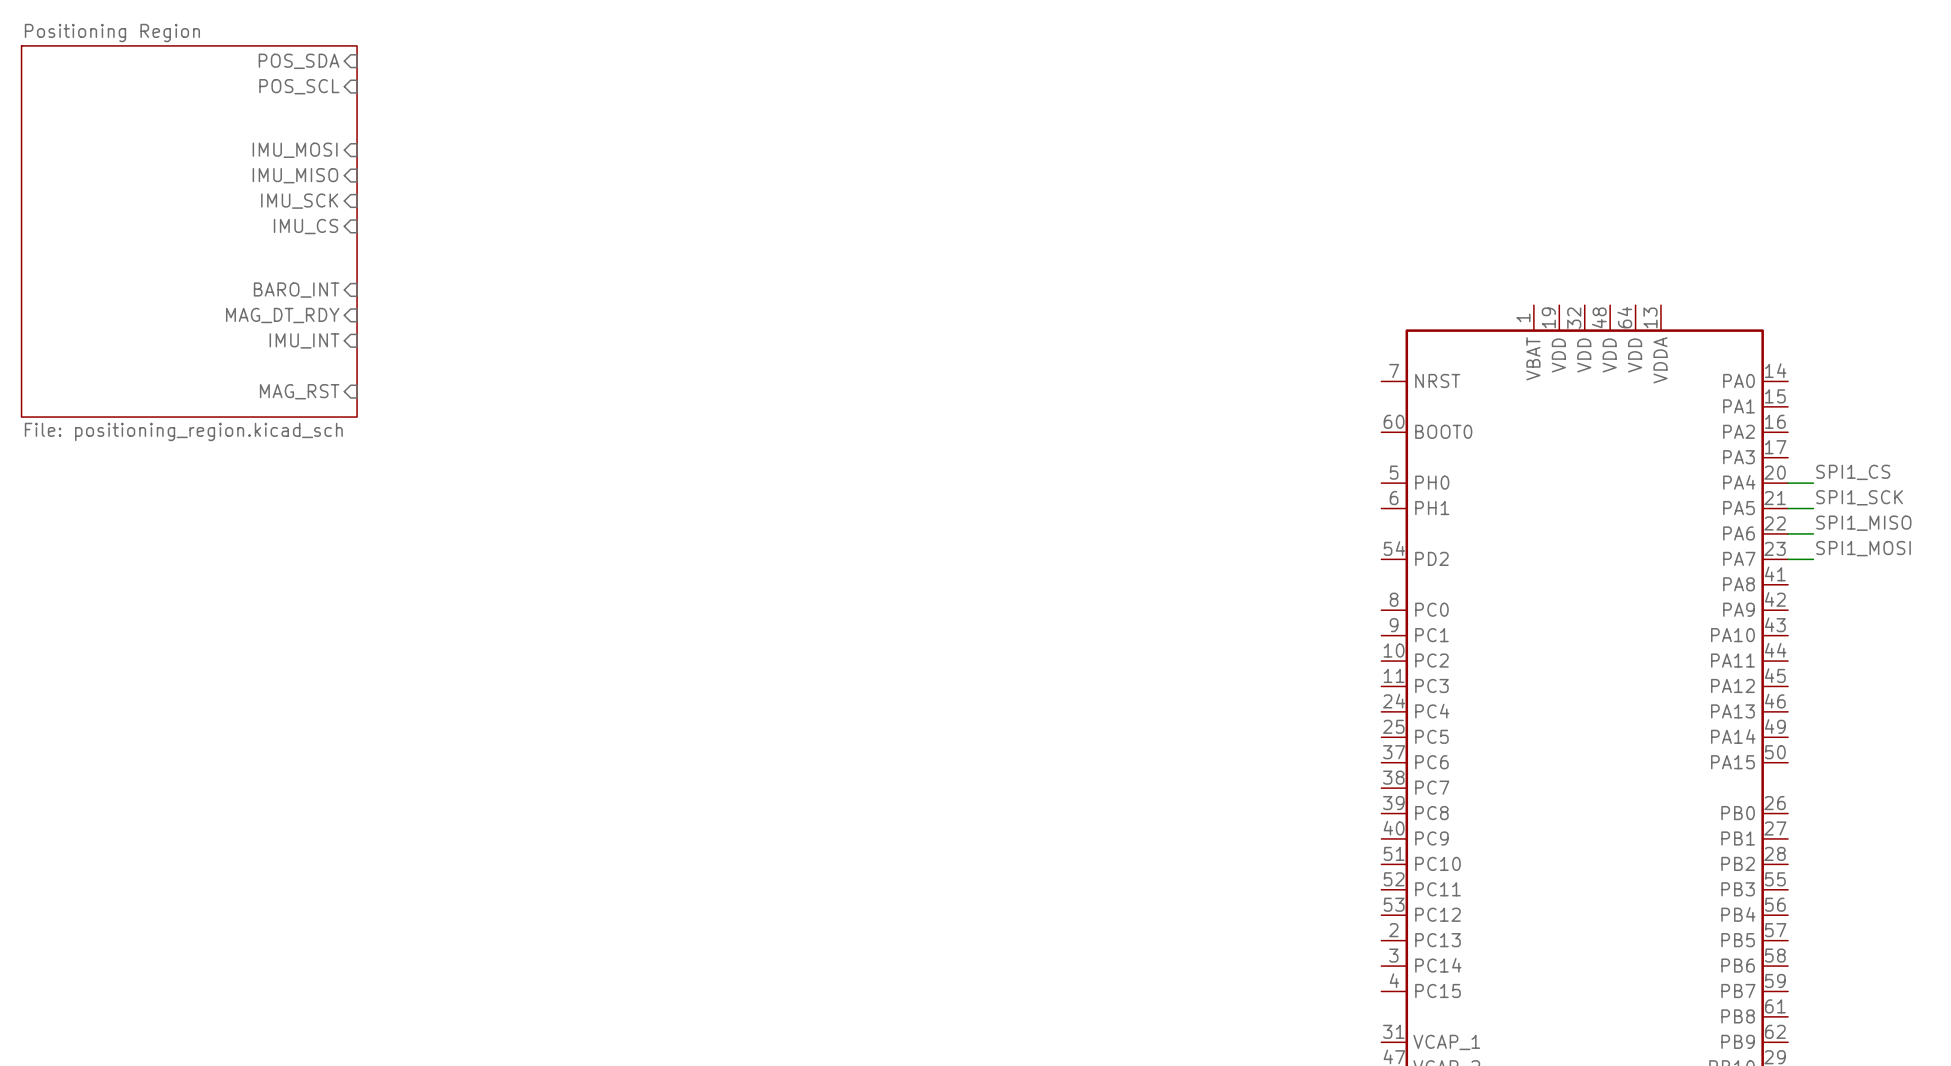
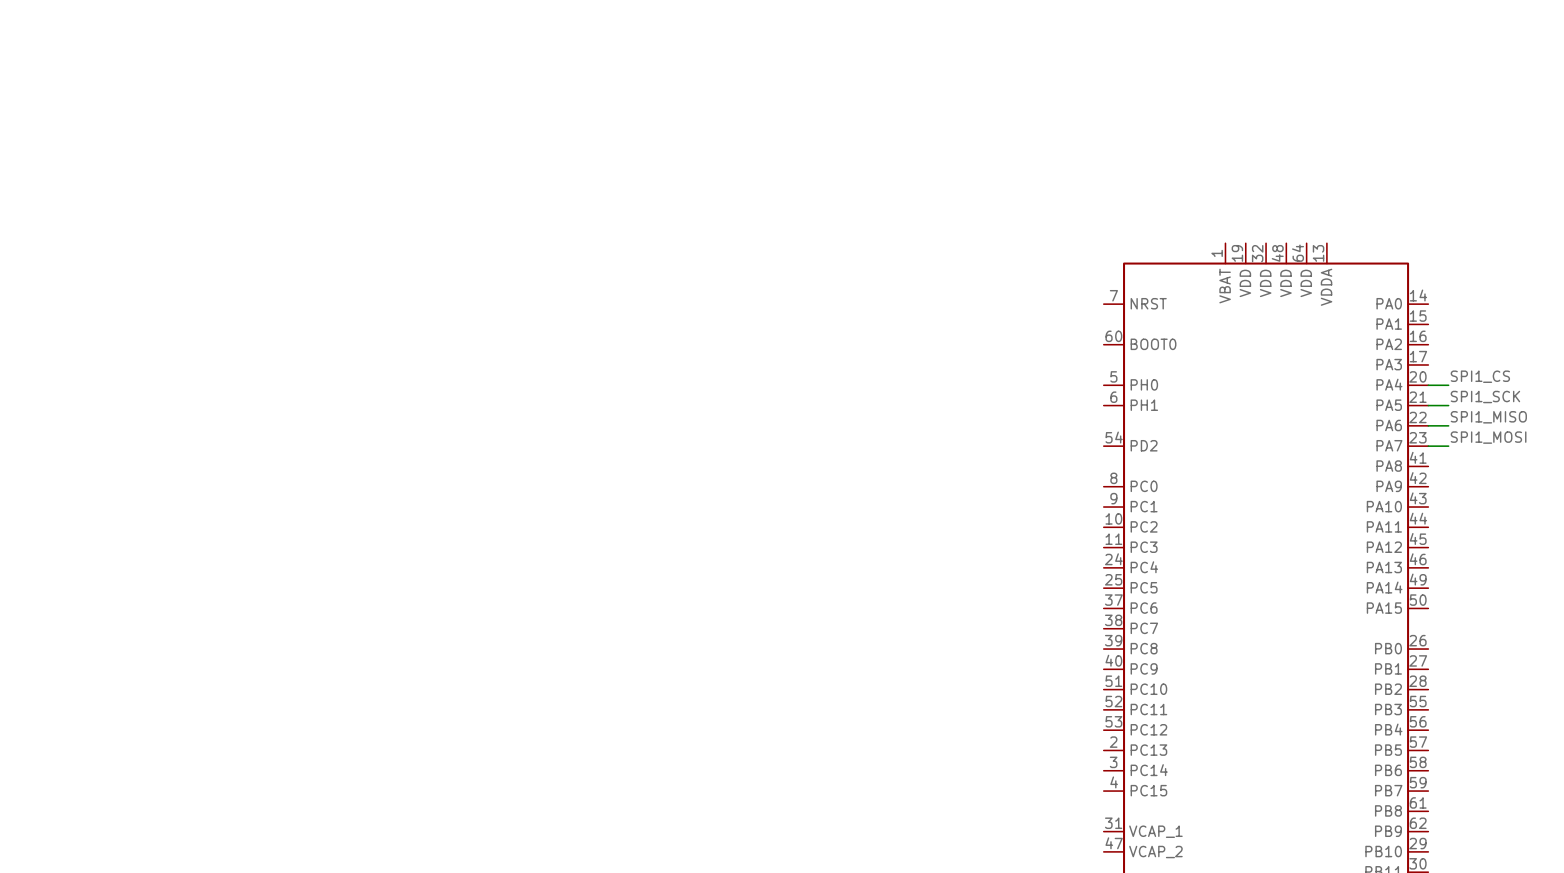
sheet pin: POS_SDA (299, 61) -> none
sheet pin: POS_SCL (299, 86) -> none
sheet pin: IMU_MOSI (295, 150) -> none
sheet pin: IMU_MISO (295, 175) -> none
sheet pin: IMU_SCK (299, 201) -> none
sheet pin: IMU_CS (306, 226) -> none
sheet Positioning Region: File: positioning_region.kicad_sch (189, 231) -> none
sheet pin: BARO_INT (296, 290) -> none
sheet pin: MAG_DT_RDY (282, 315) -> none
sheet pin: IMU_INT (304, 340) -> none
sheet pin: MAG_RST (299, 391) -> none

